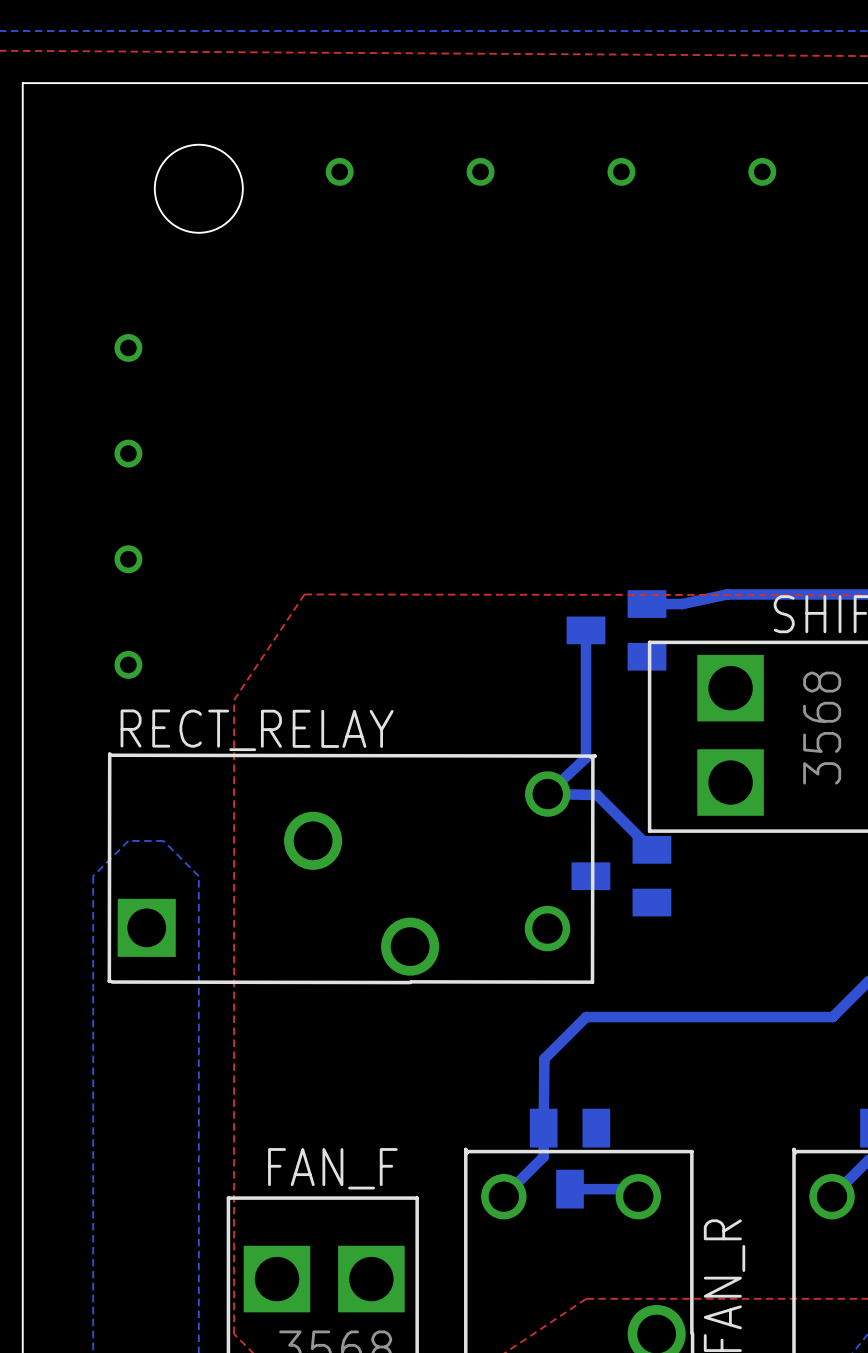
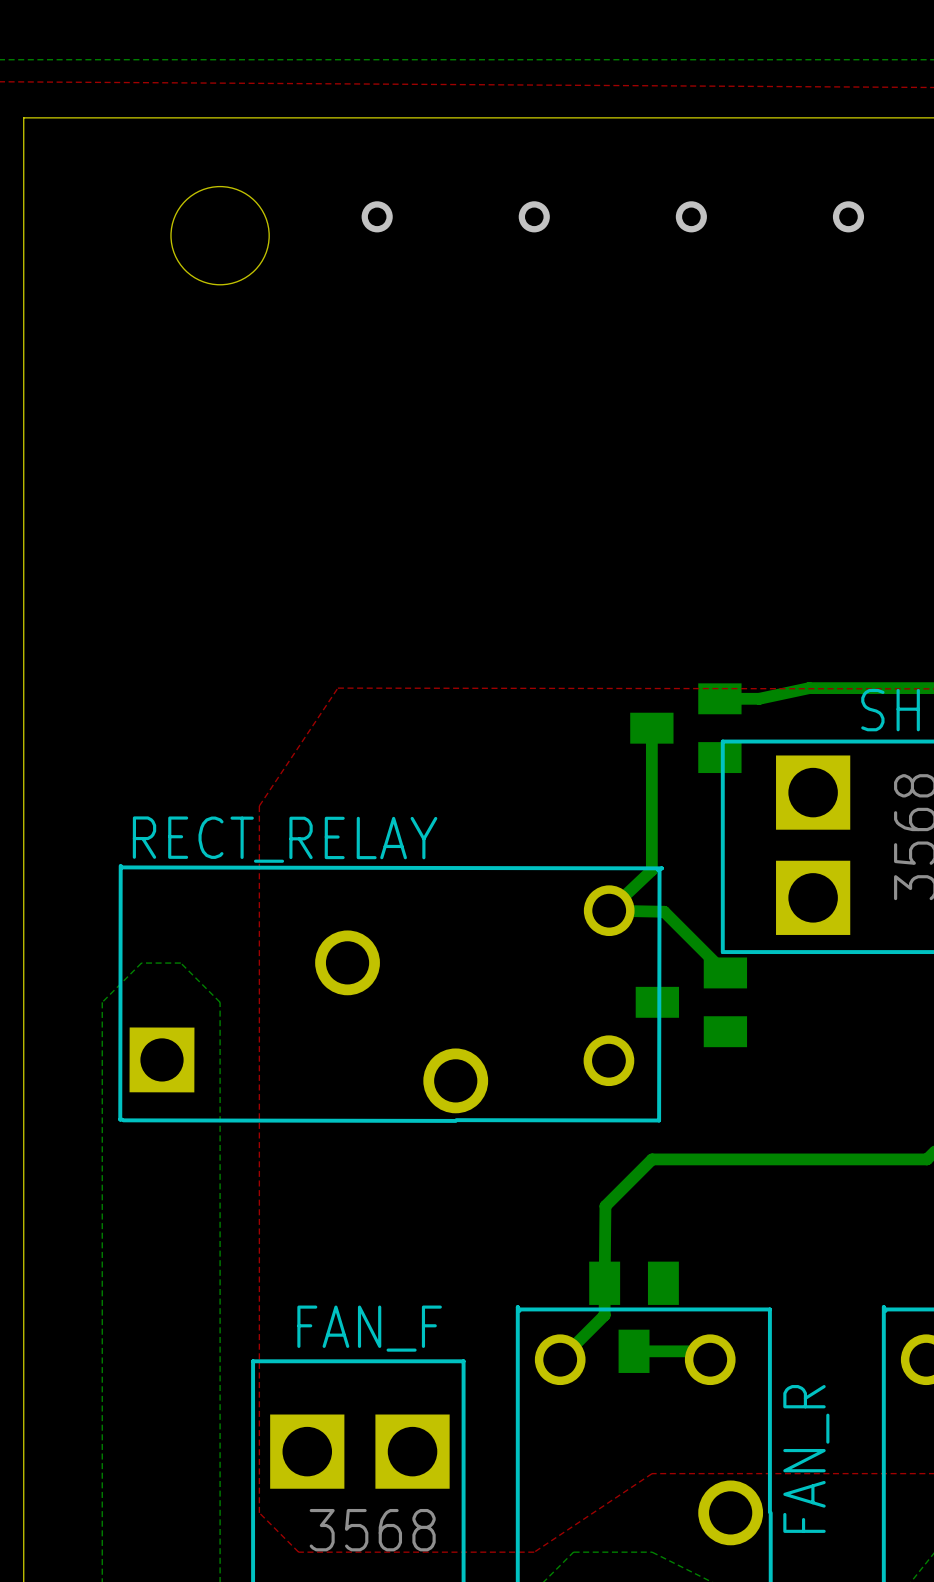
via: (128, 347) -> none
via: (128, 453) -> none
via: (128, 559) -> none
via: (128, 664) -> none

